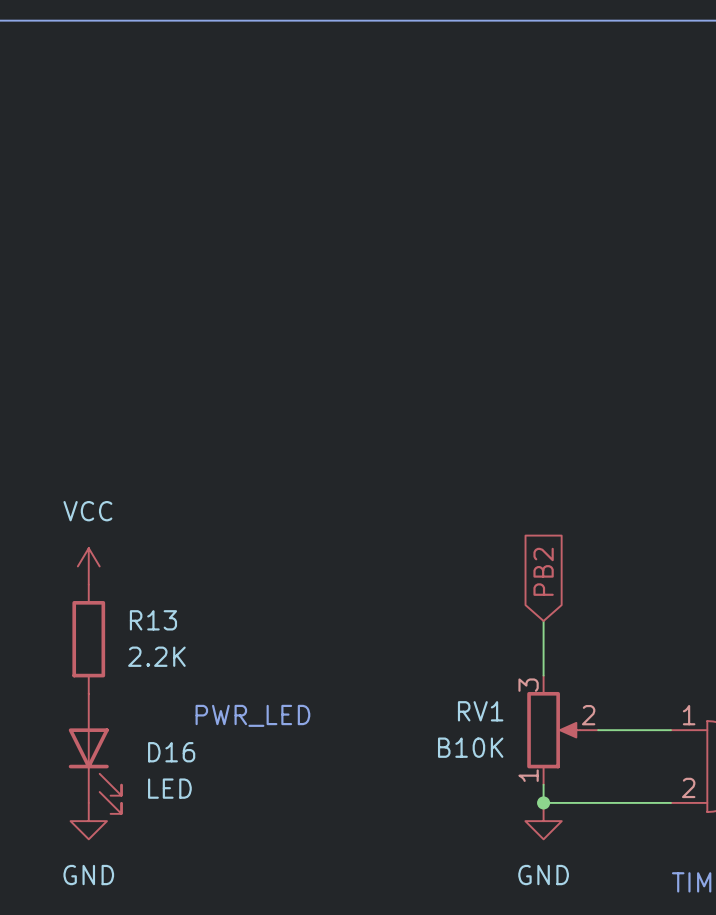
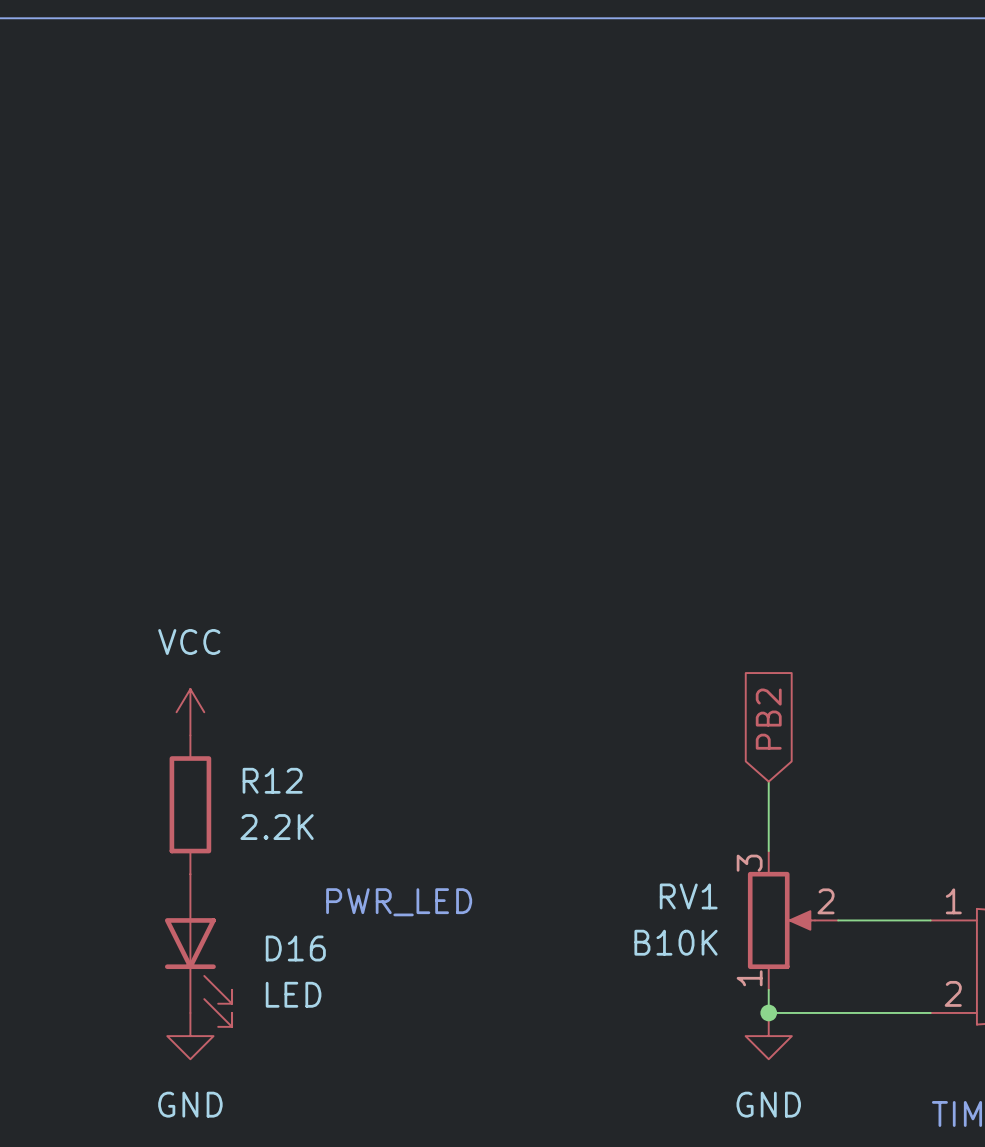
R13 name: R13 (153, 620) -> R12 (272, 780)

